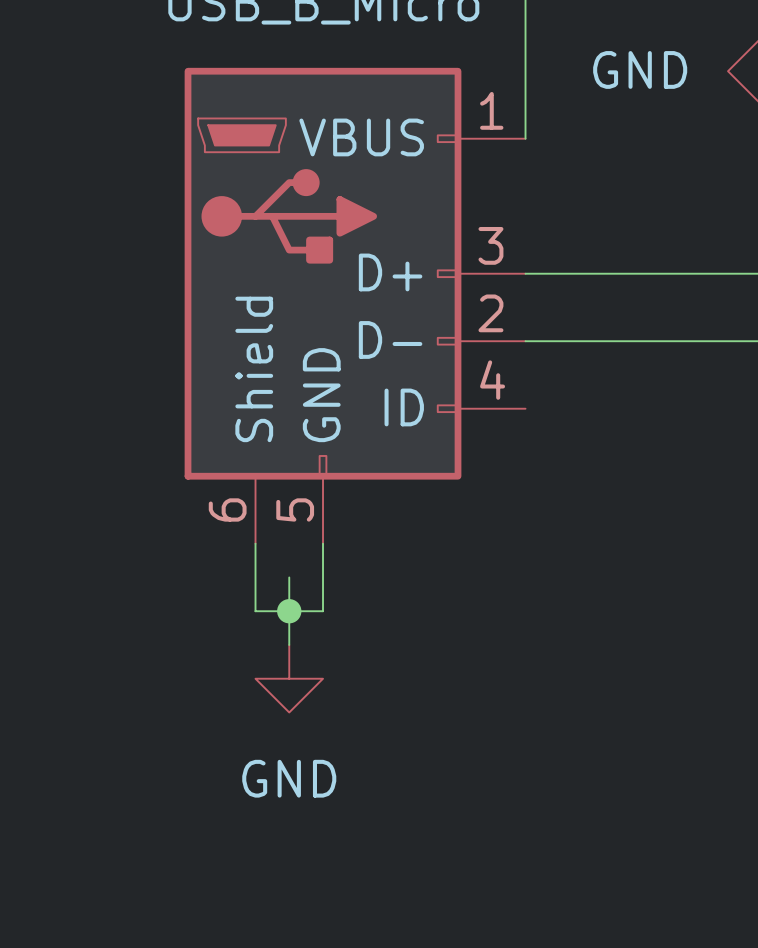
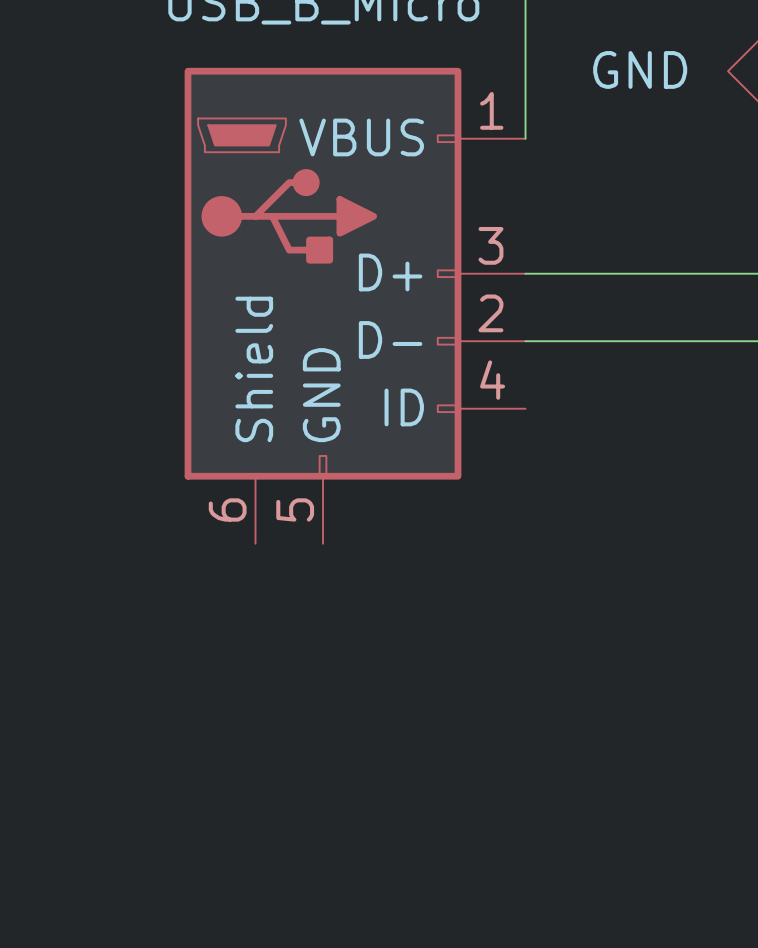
wire: (255, 543) (255, 611) (323, 611) (323, 543) -> none
wire: (289, 577) (289, 644) -> none
junction: (289, 611) -> none
power symbol: GND (289, 678) -> none

